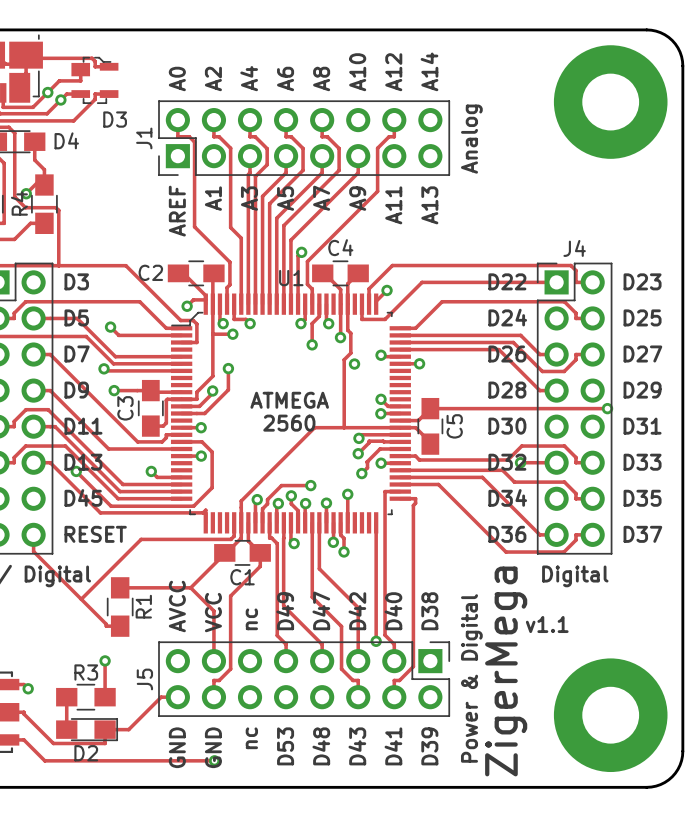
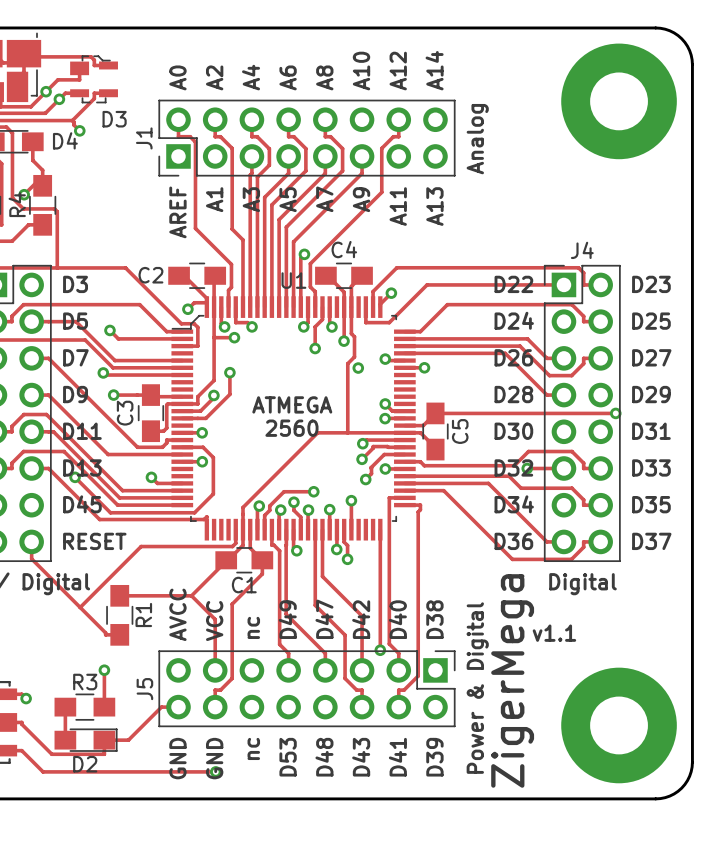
track: none -> (72, 120) (79, 130)
via: none -> (79, 130)

